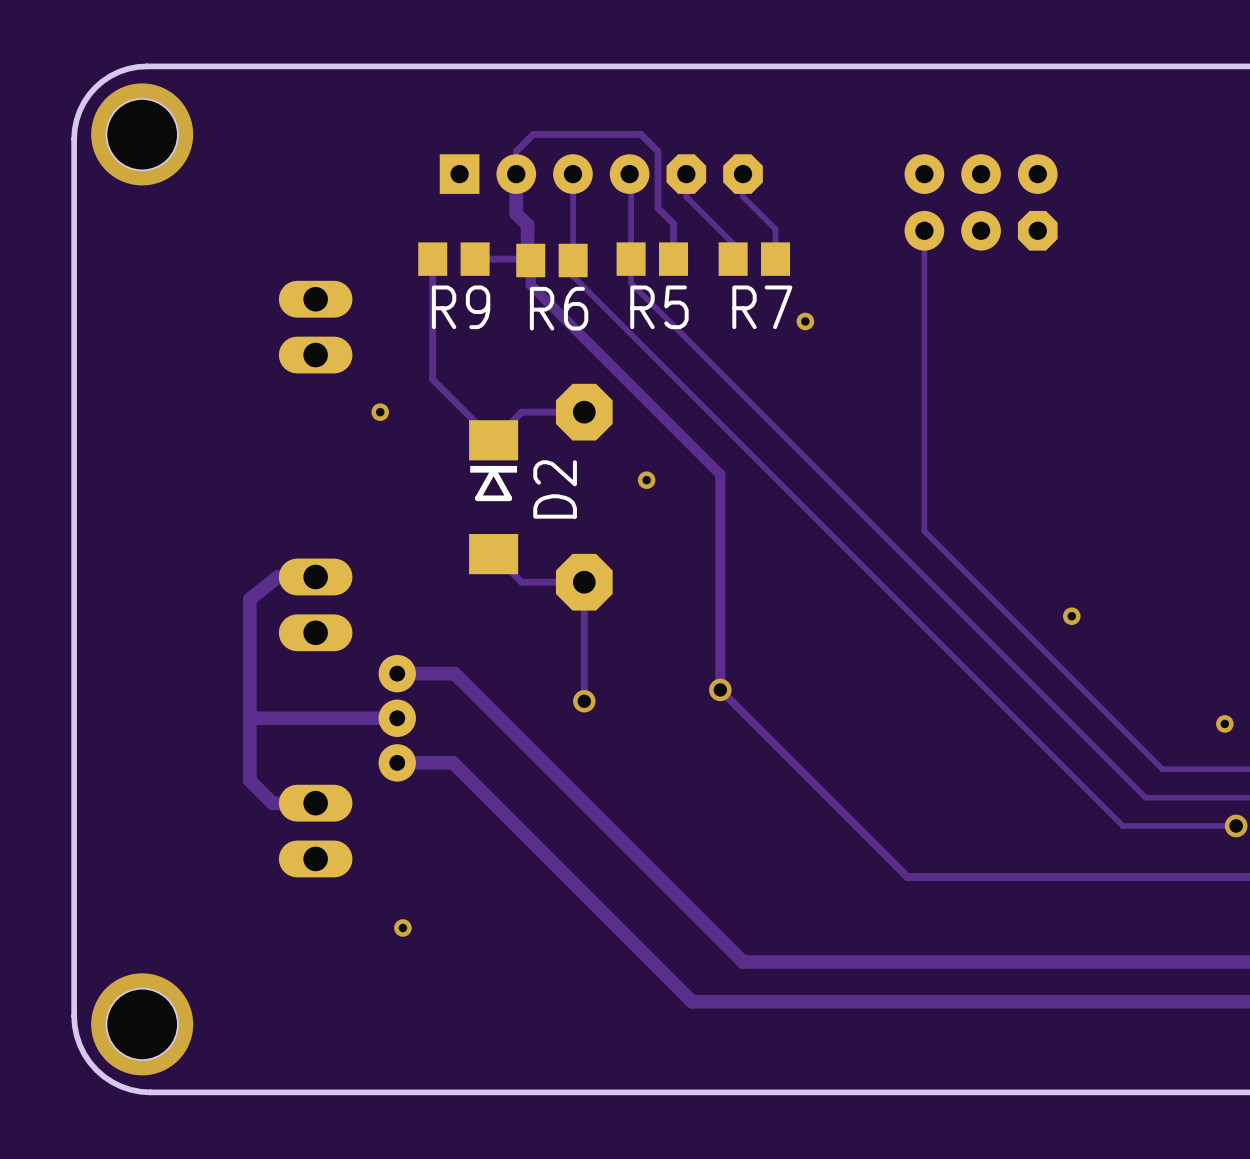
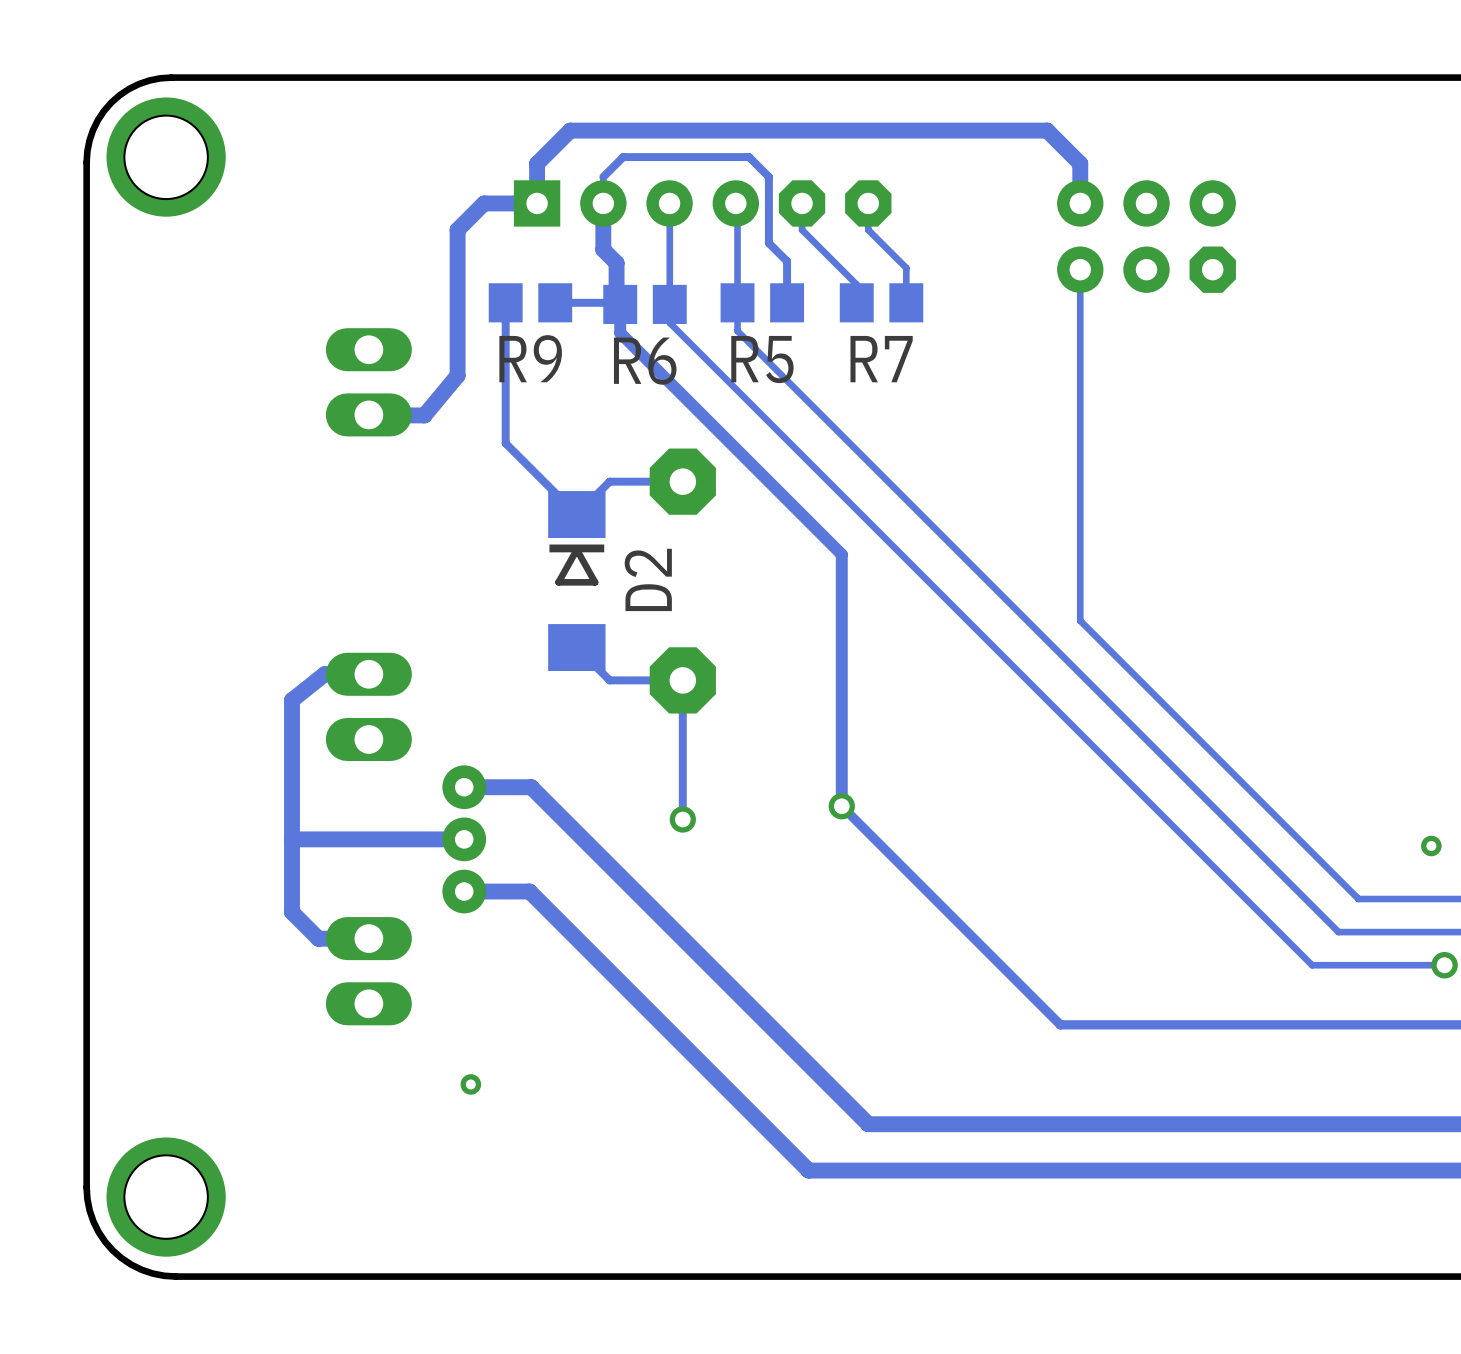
track: none -> (543, 203) (484, 203) (457, 229) (457, 375) (424, 415) (368, 414)
track: none -> (1080, 203) (1080, 163) (1047, 130) (570, 130) (537, 163) (537, 203)
via: (805, 321) -> none
via: (380, 412) -> none
via: (646, 480) -> none
via: (1071, 616) -> none

